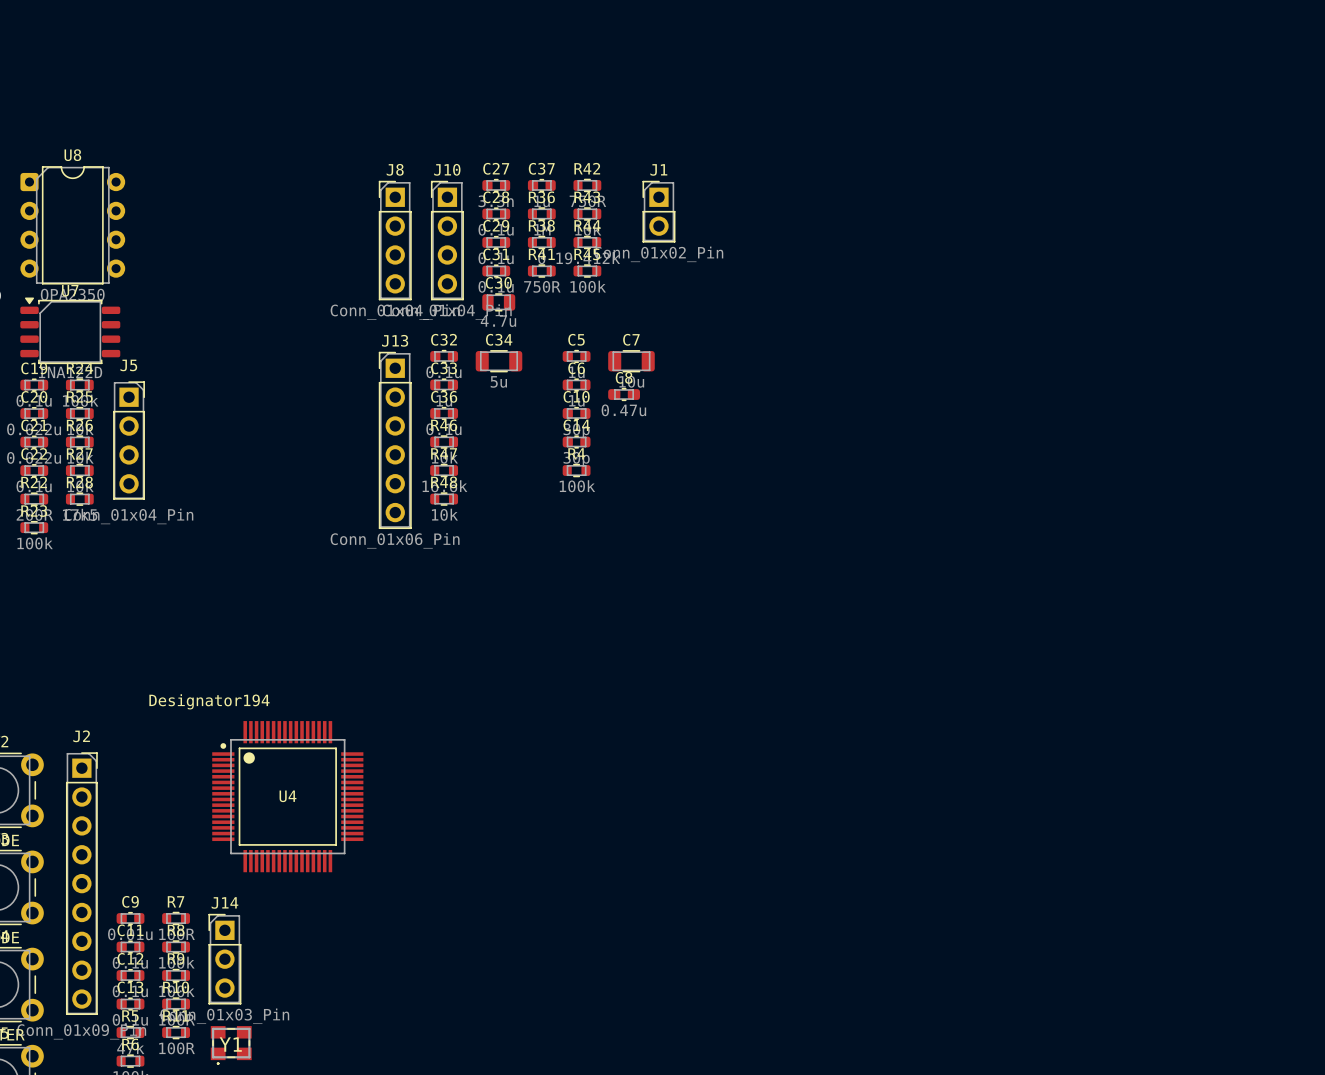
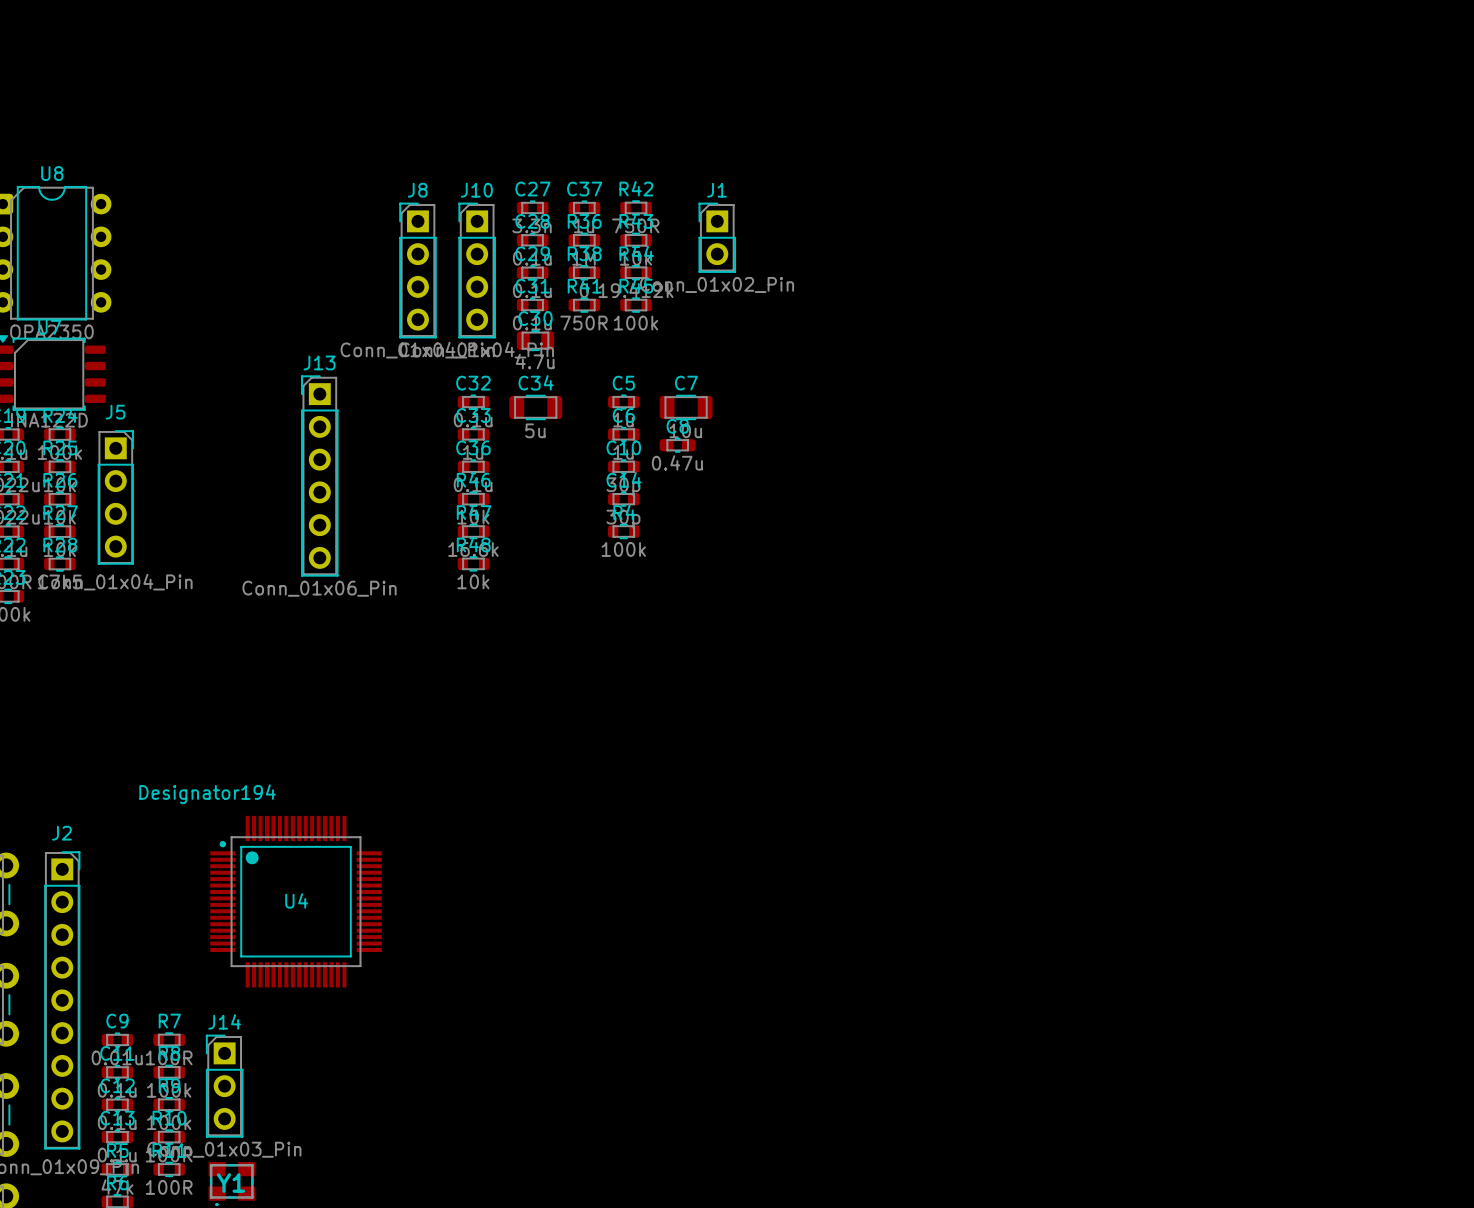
J13 position: (395, 440) -> (319, 476)

